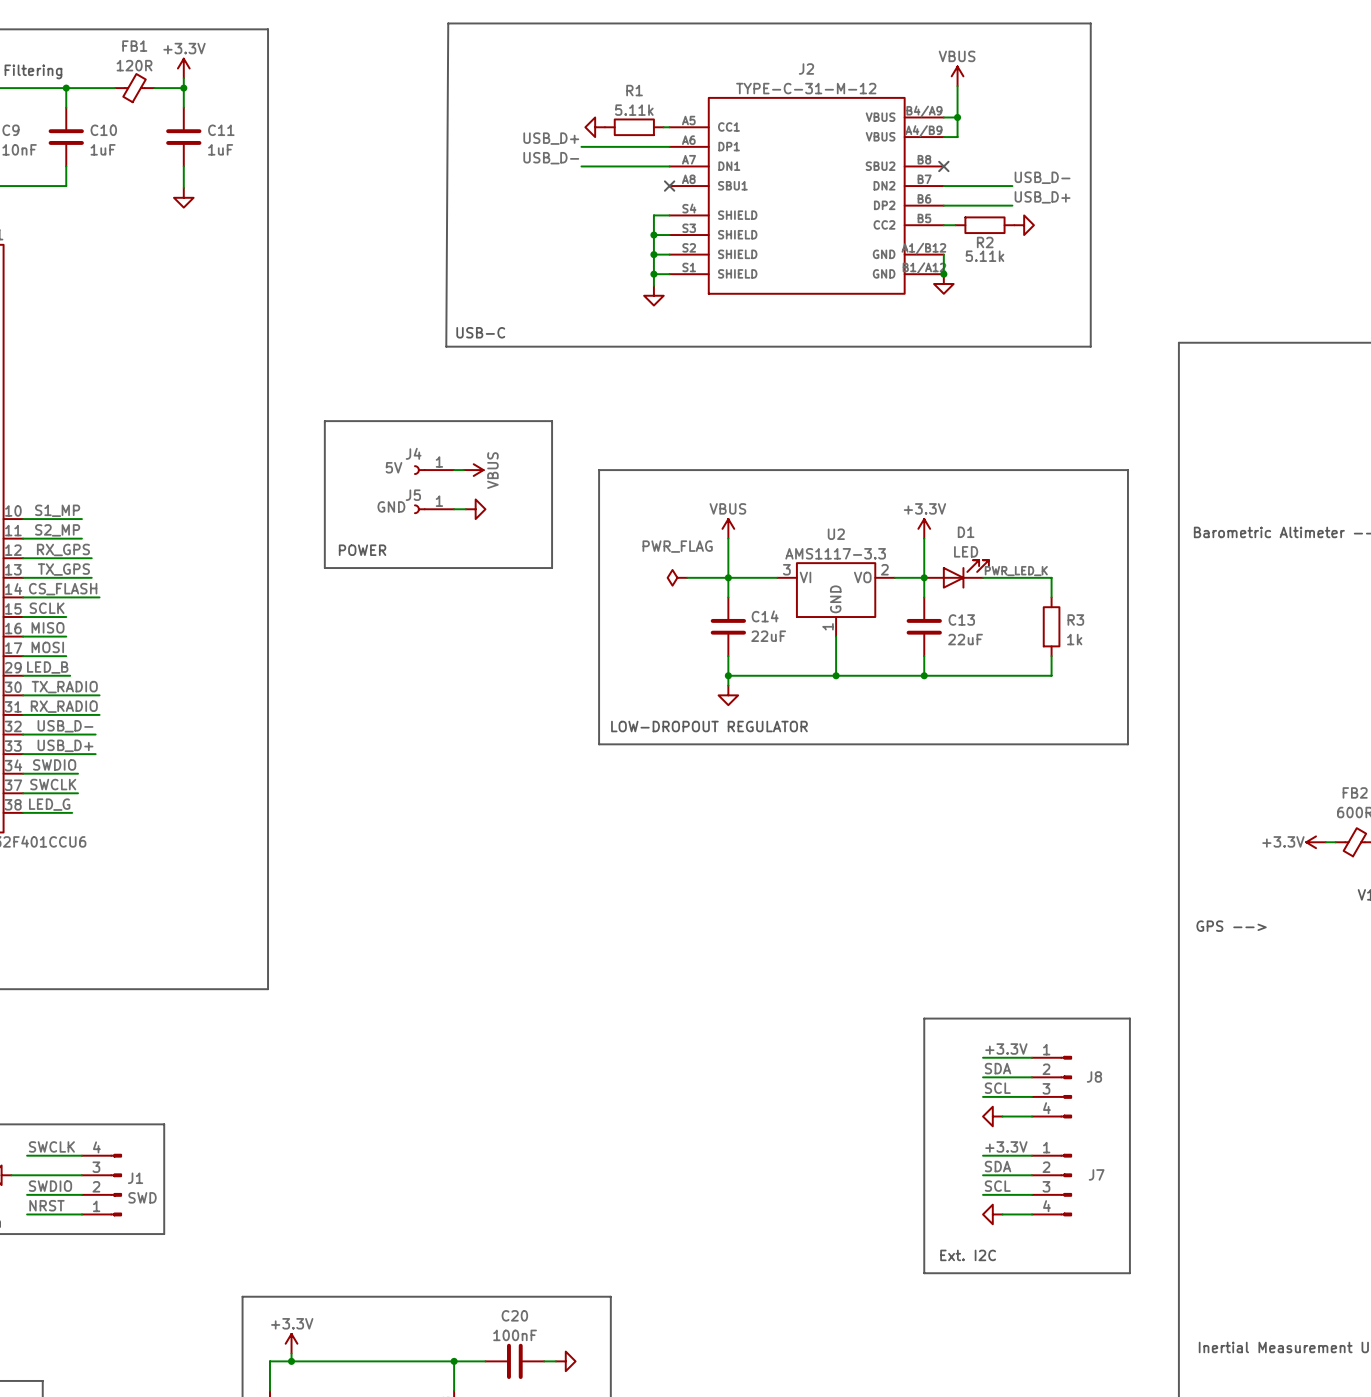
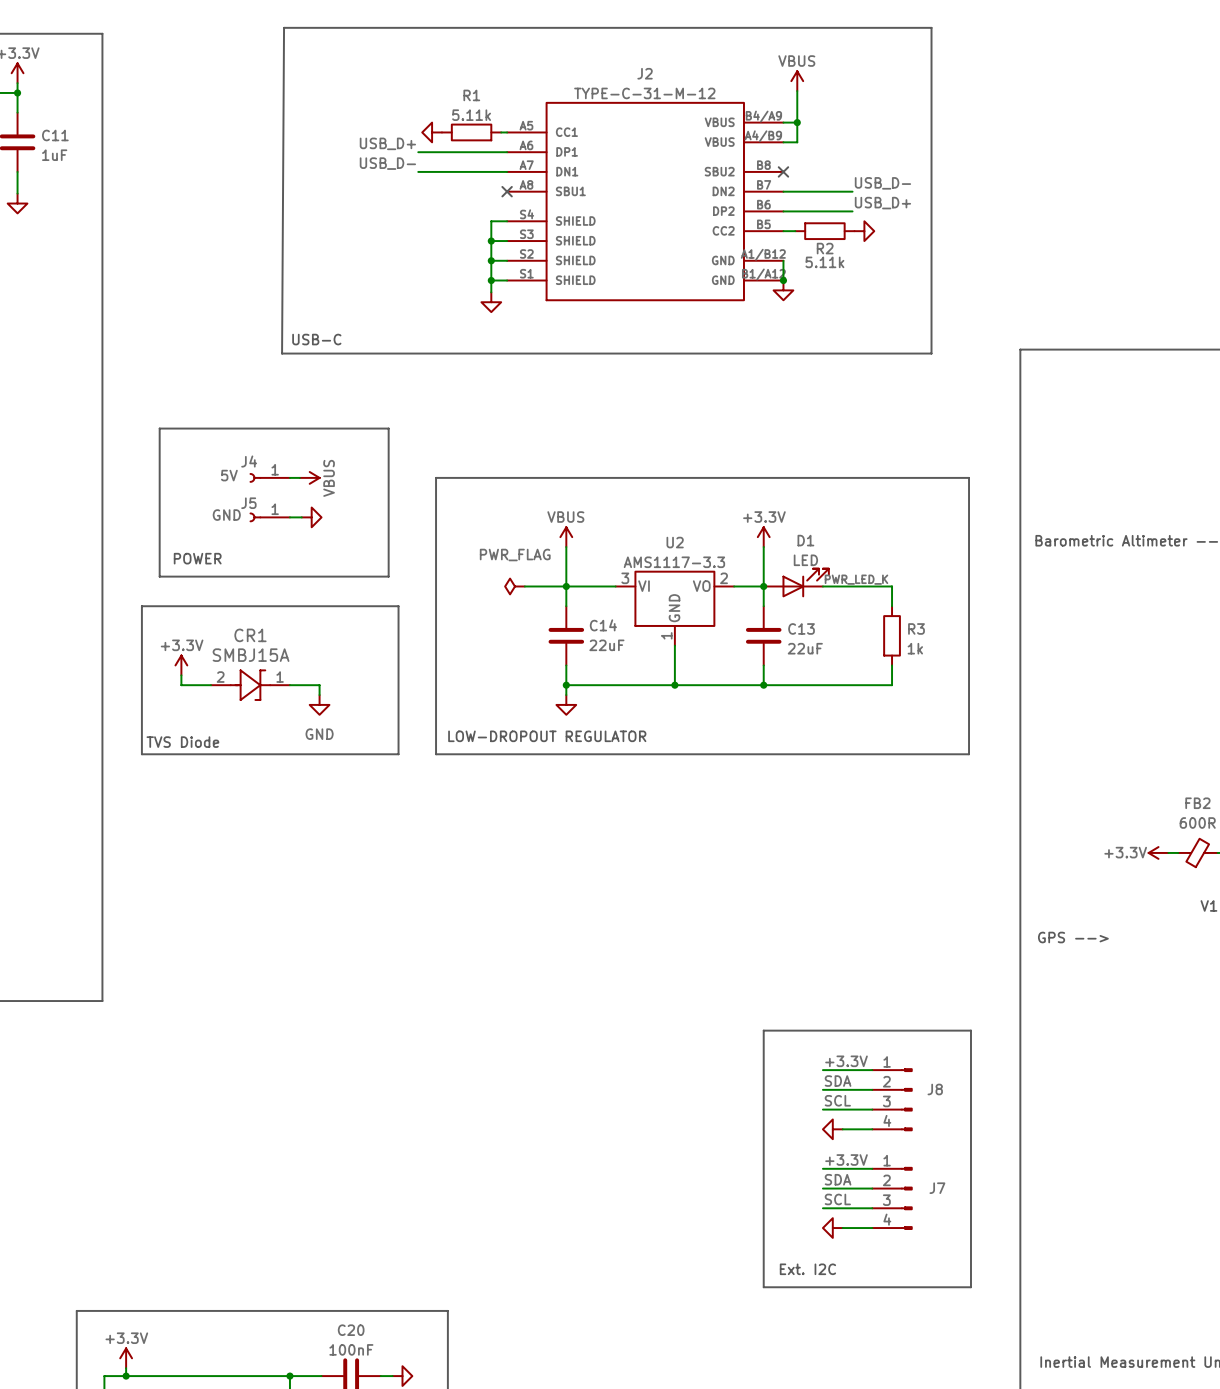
line: none -> (141, 606) (398, 606) (398, 754) (141, 754) (141, 606)
power symbol: none -> +3.3V (181, 665)
wire: none -> (181, 675) (181, 685) (211, 685)
CR1: none -> SMBJ15A (250, 685)
wire: none -> (289, 685) (319, 685) (319, 695)
power symbol: none -> GND (319, 704)
text: none -> TVS Diode (182, 742)

